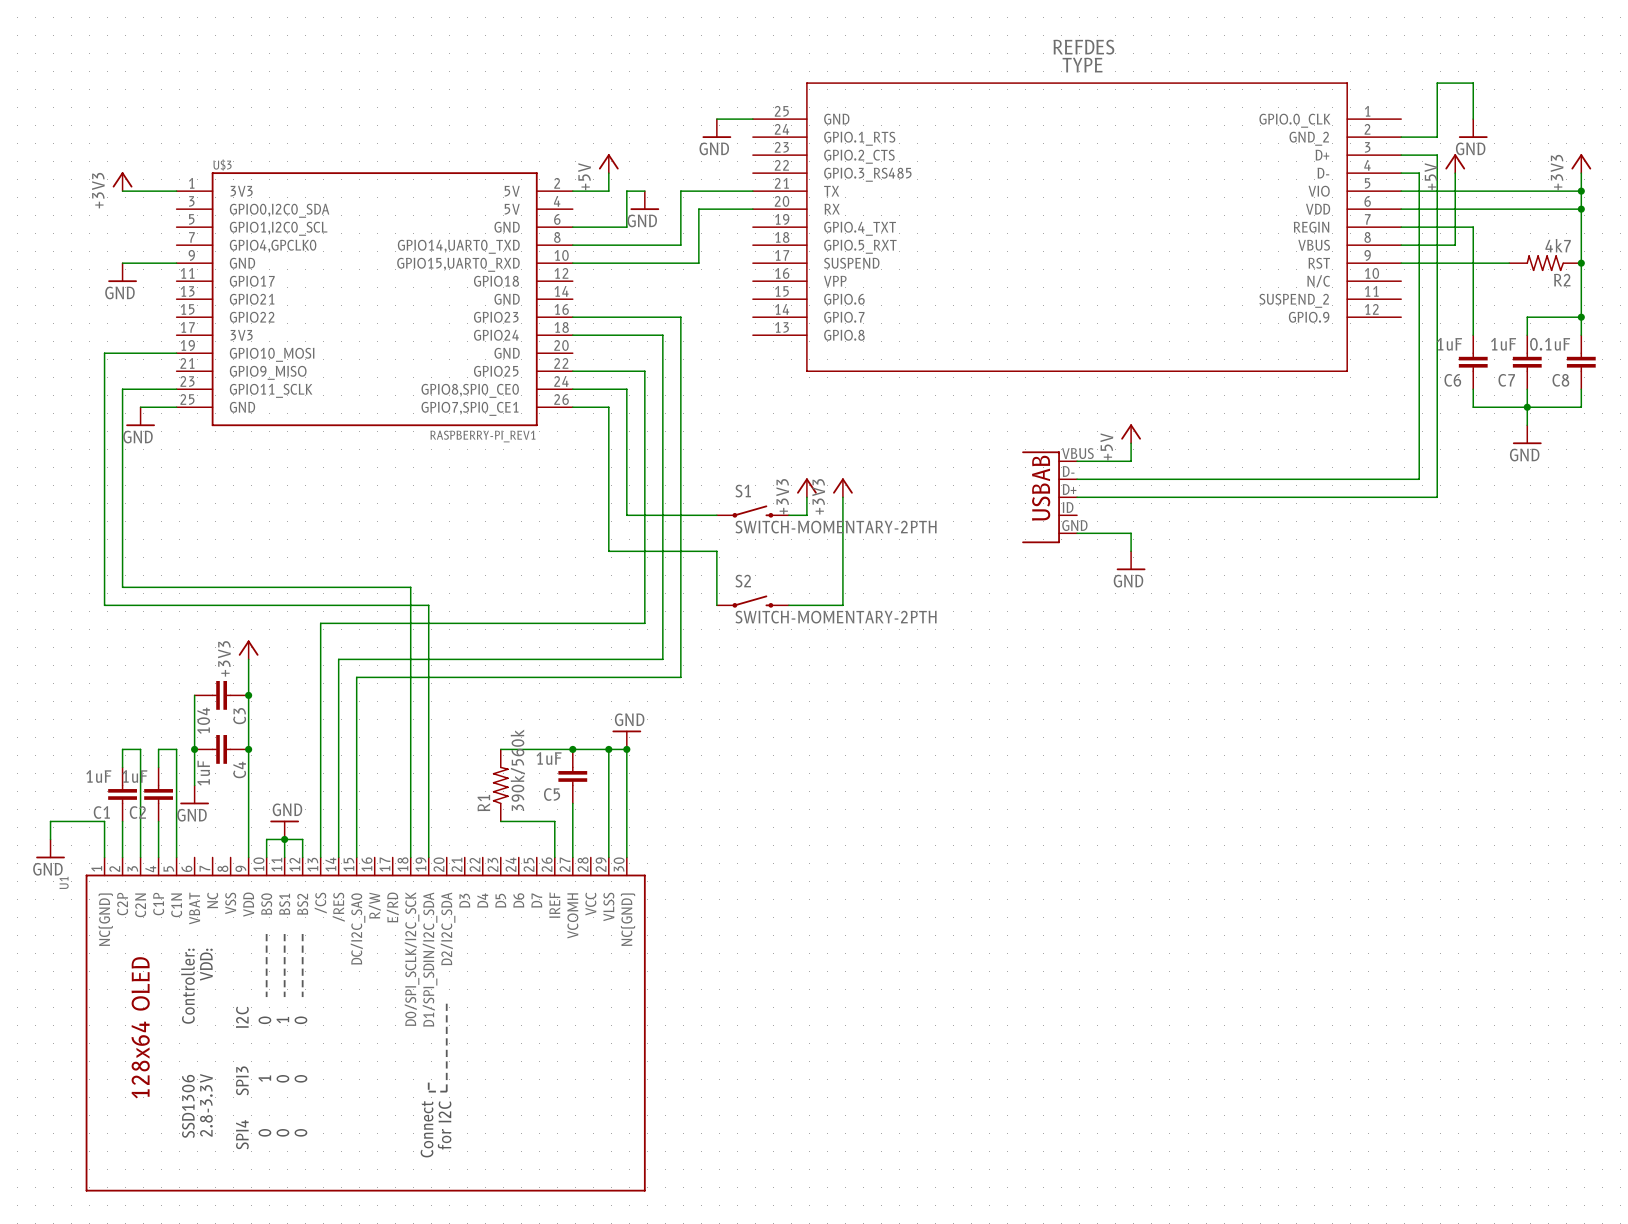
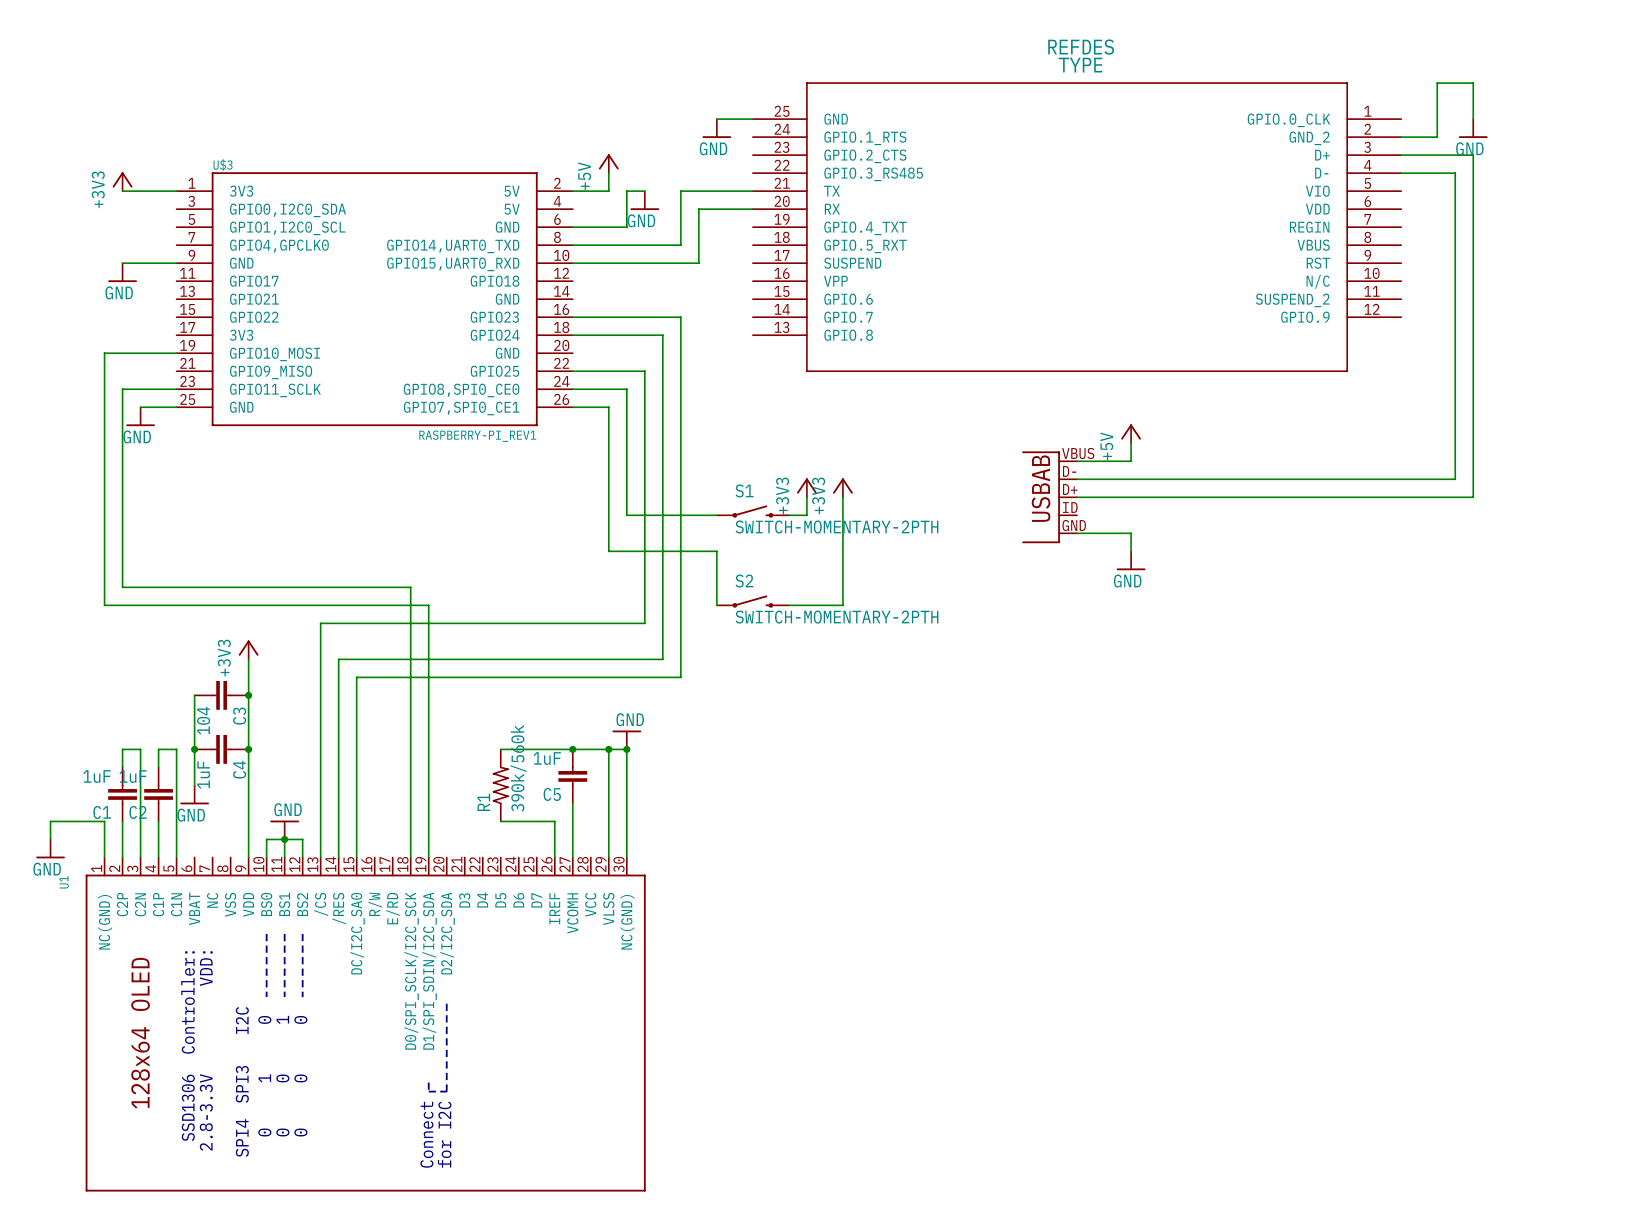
wire: (1437, 155) (1437, 497) -> none
power symbol: +5V (1455, 163) -> none
power symbol: +3V3 (1581, 163) -> none
wire: (1419, 173) (1419, 479) -> (1455, 245) (1455, 479) (1419, 479)
wire: none -> (1419, 173) (1455, 173)
wire: (1581, 173) (1581, 335) -> none
wire: (1401, 191) (1581, 191) -> none
junction: (1581, 191) -> none
wire: (1401, 209) (1581, 209) -> none
junction: (1581, 209) -> none
wire: (1401, 227) (1473, 227) -> (1437, 155) (1473, 155) (1473, 227)
wire: (1401, 245) (1455, 245) -> none
wire: (1401, 263) (1509, 263) -> none
R2: 4k7 (1545, 263) -> none
junction: (1581, 263) -> none
wire: (1581, 317) (1527, 317) (1527, 335) -> none
junction: (1581, 317) -> none
C6: 1uF (1473, 362) -> none
C7: 1uF (1527, 362) -> none
C8: 0.1uF (1581, 362) -> none
wire: (1527, 389) (1527, 425) -> none
wire: (1581, 389) (1581, 407) (1473, 407) -> (1437, 497) (1473, 497) (1473, 407)
junction: (1527, 407) -> none
power symbol: GND (1527, 434) -> none

